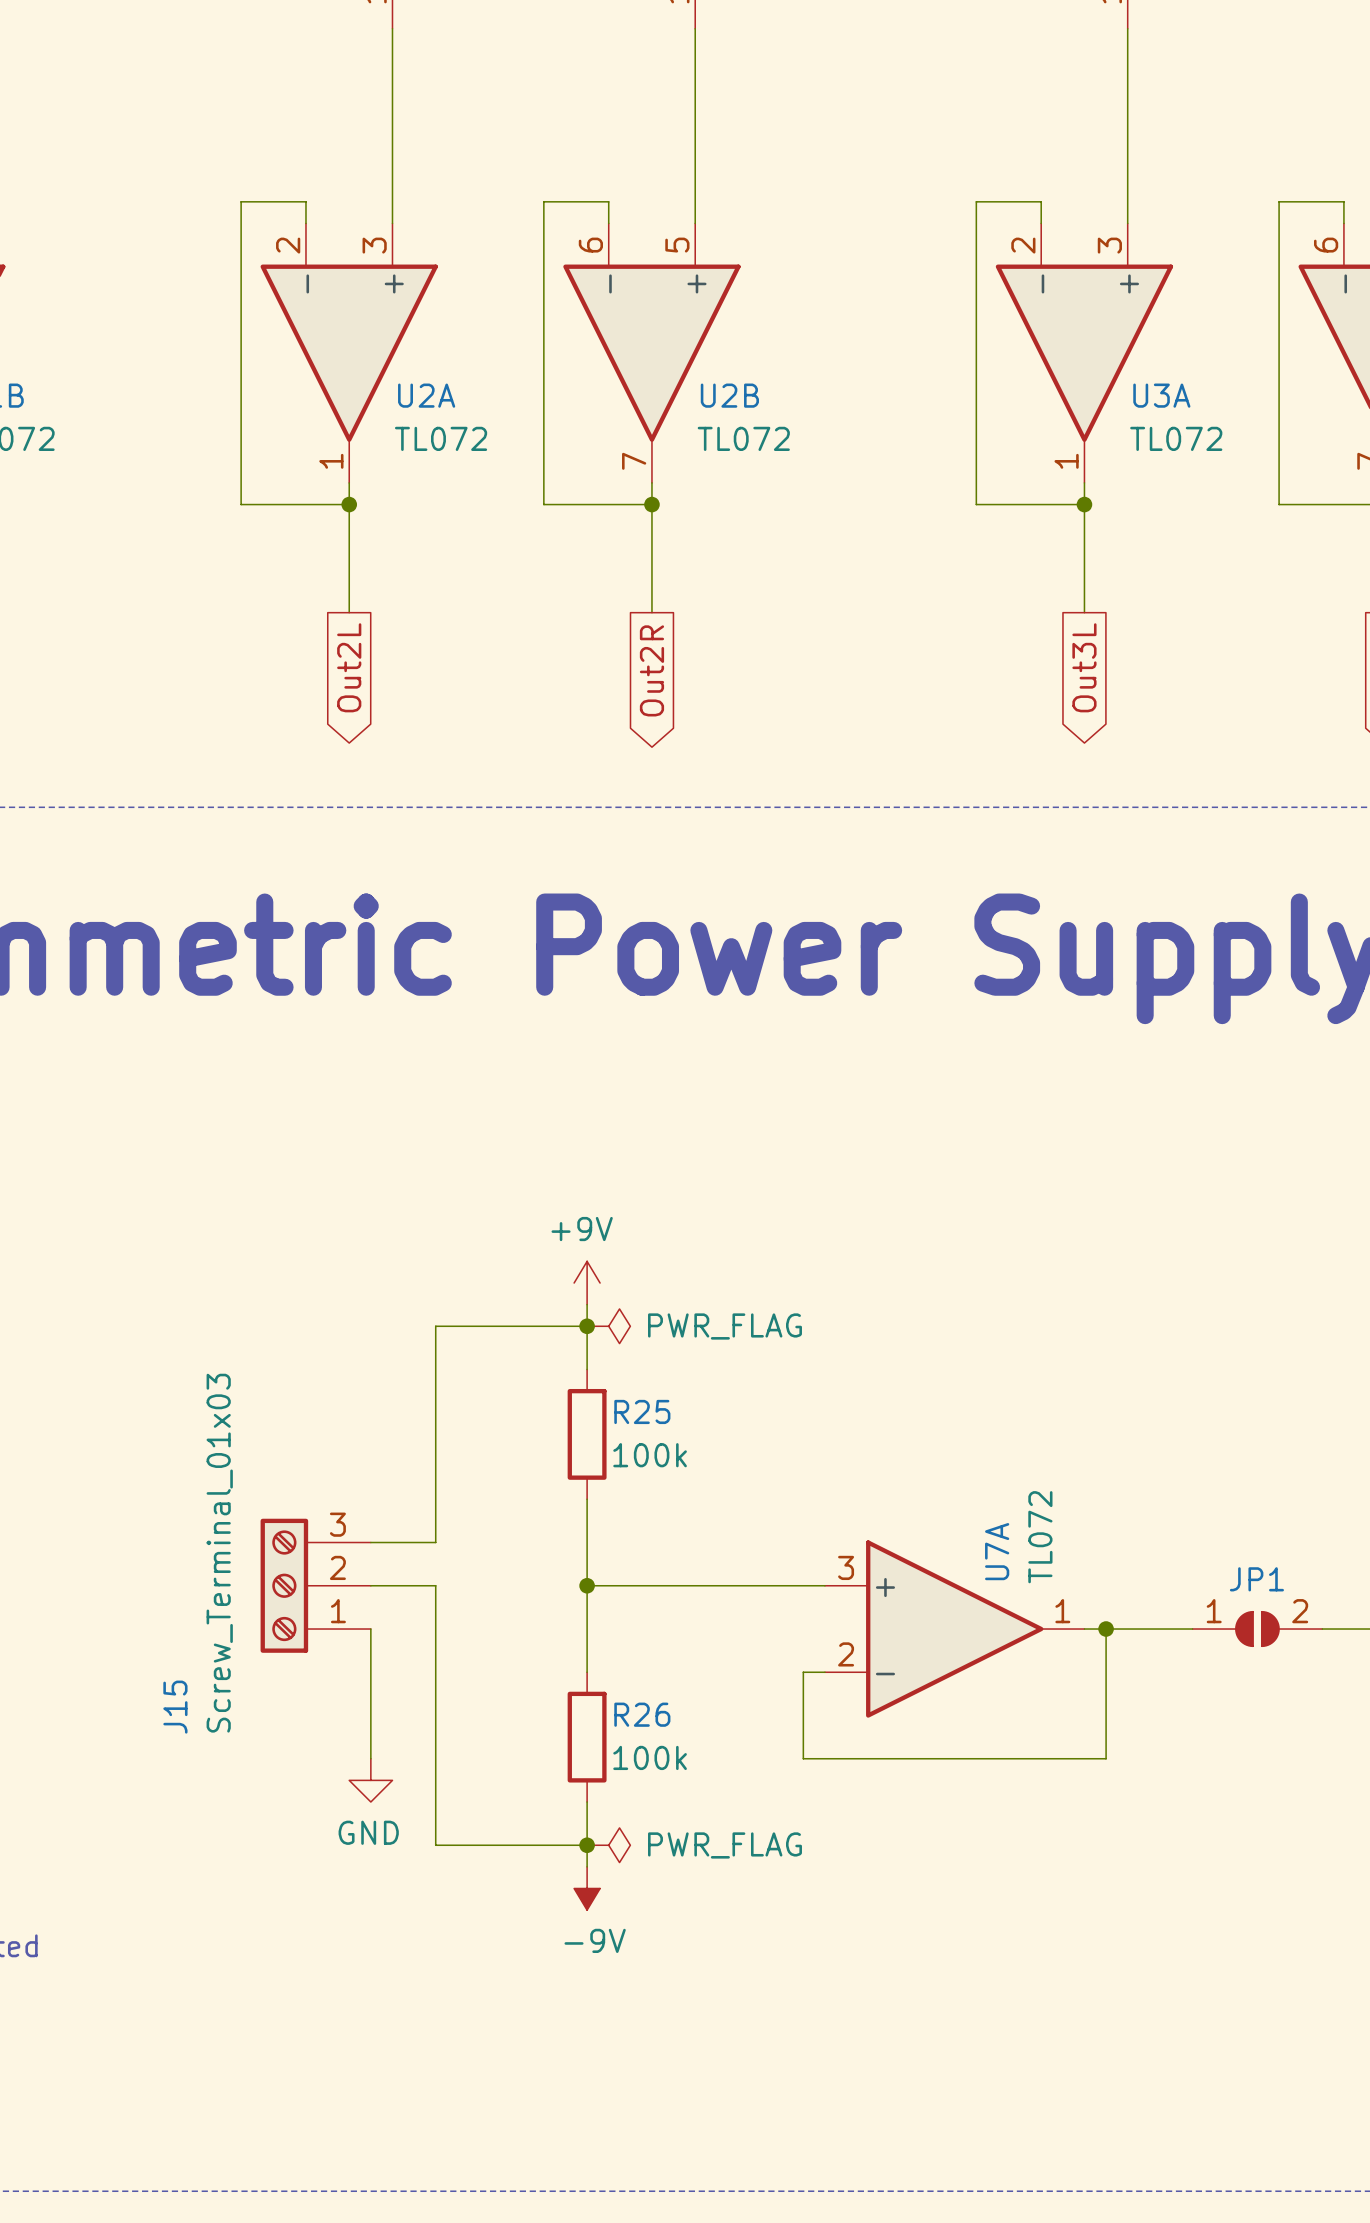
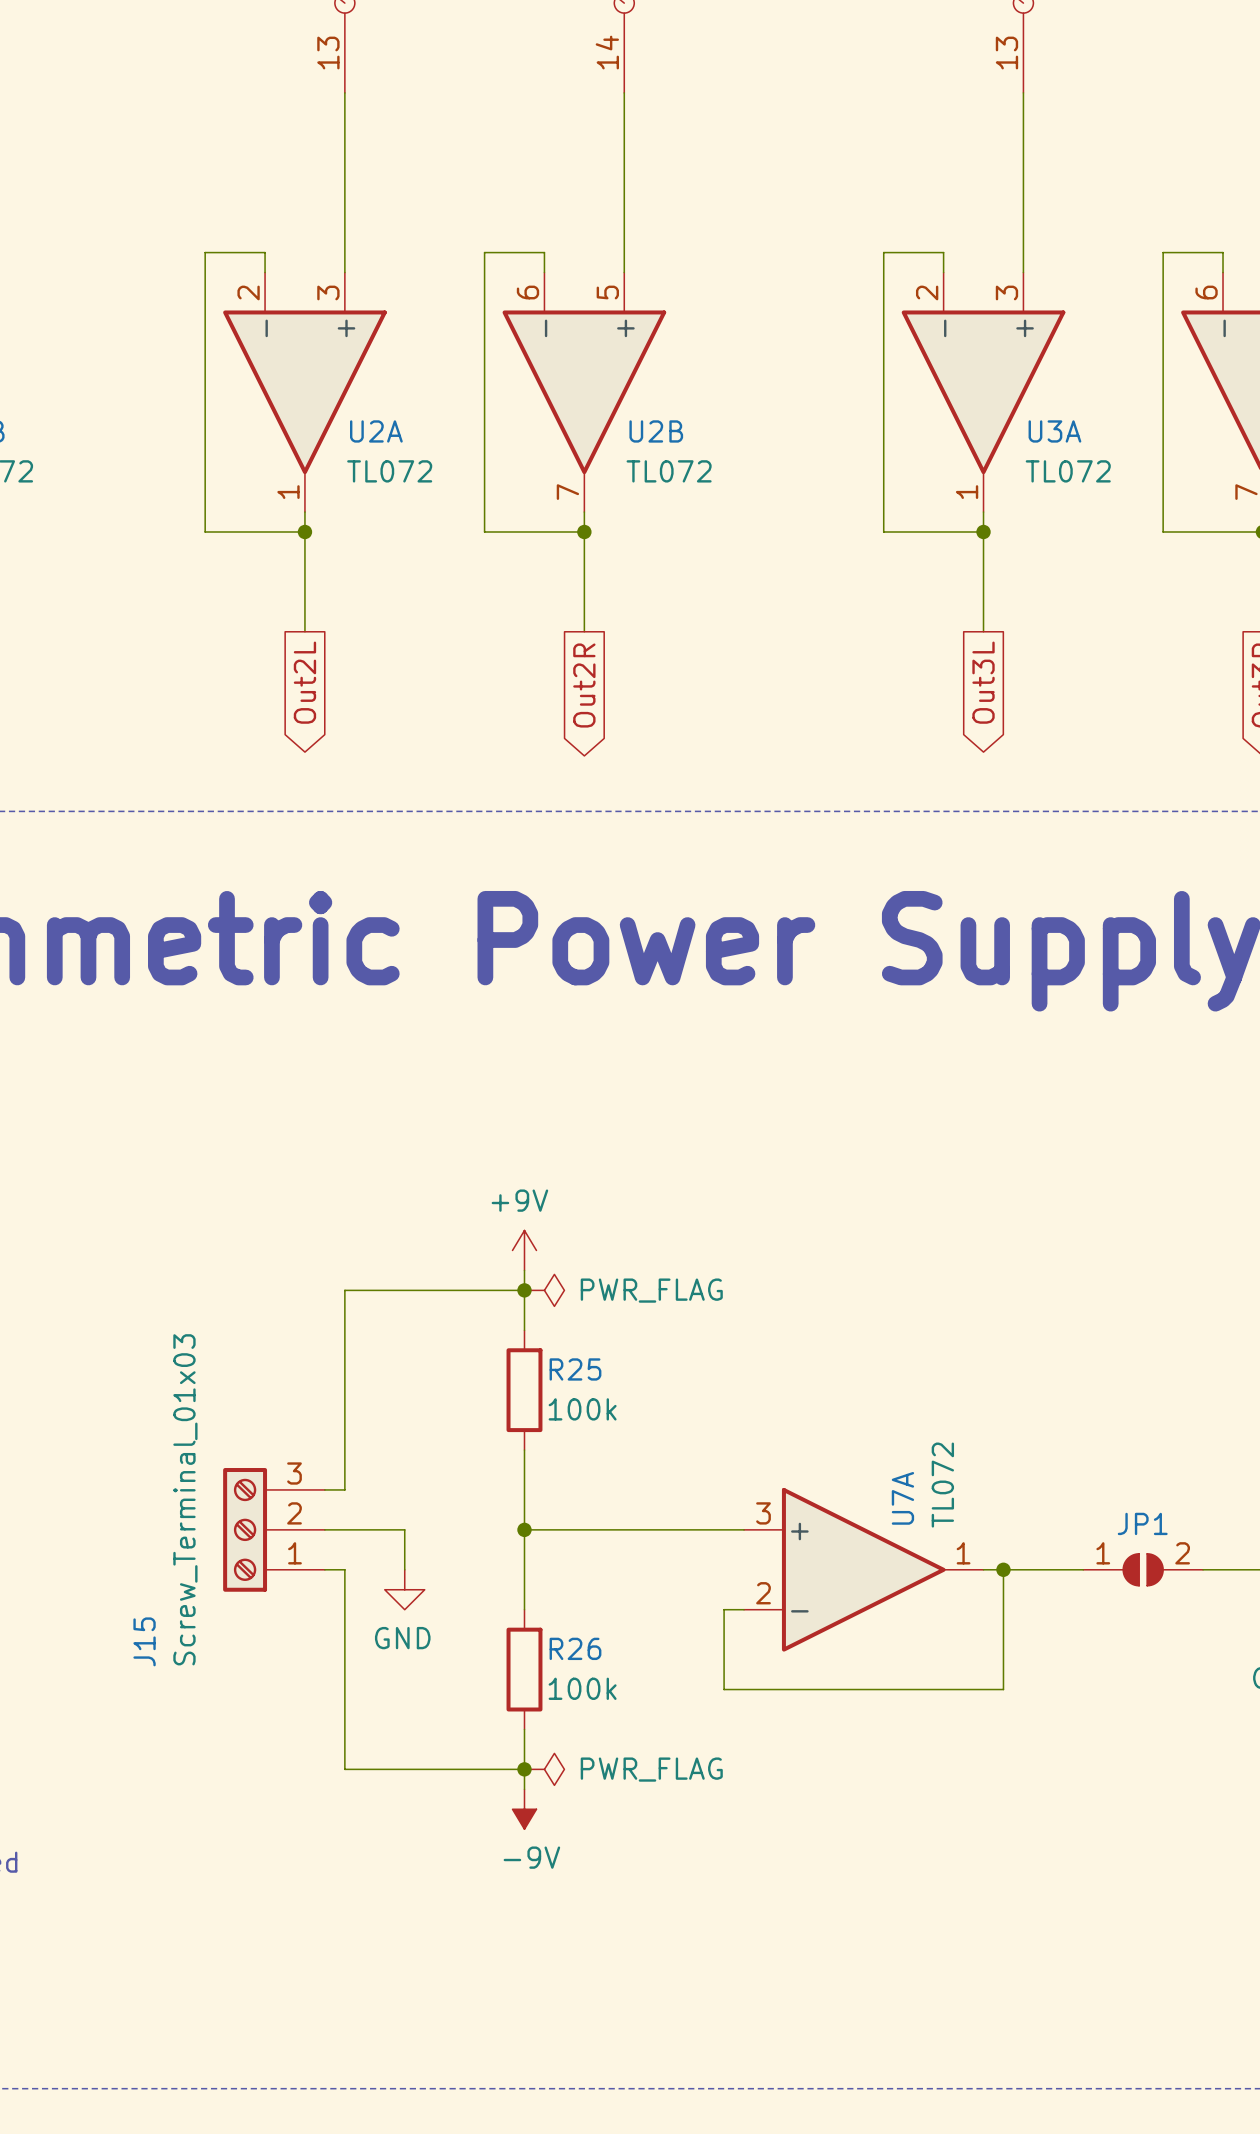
wire: (435, 1326) (435, 1542) (392, 1542) -> (384, 1290) (344, 1290) (344, 1489)
wire: (435, 1585) (435, 1845) -> (324, 1569) (344, 1569) (344, 1769) (384, 1769)
wire: none -> (384, 1529) (404, 1529) (404, 1569)
wire: (370, 1629) (370, 1758) -> none
power symbol position: GND (370, 1780) -> GND (404, 1589)

